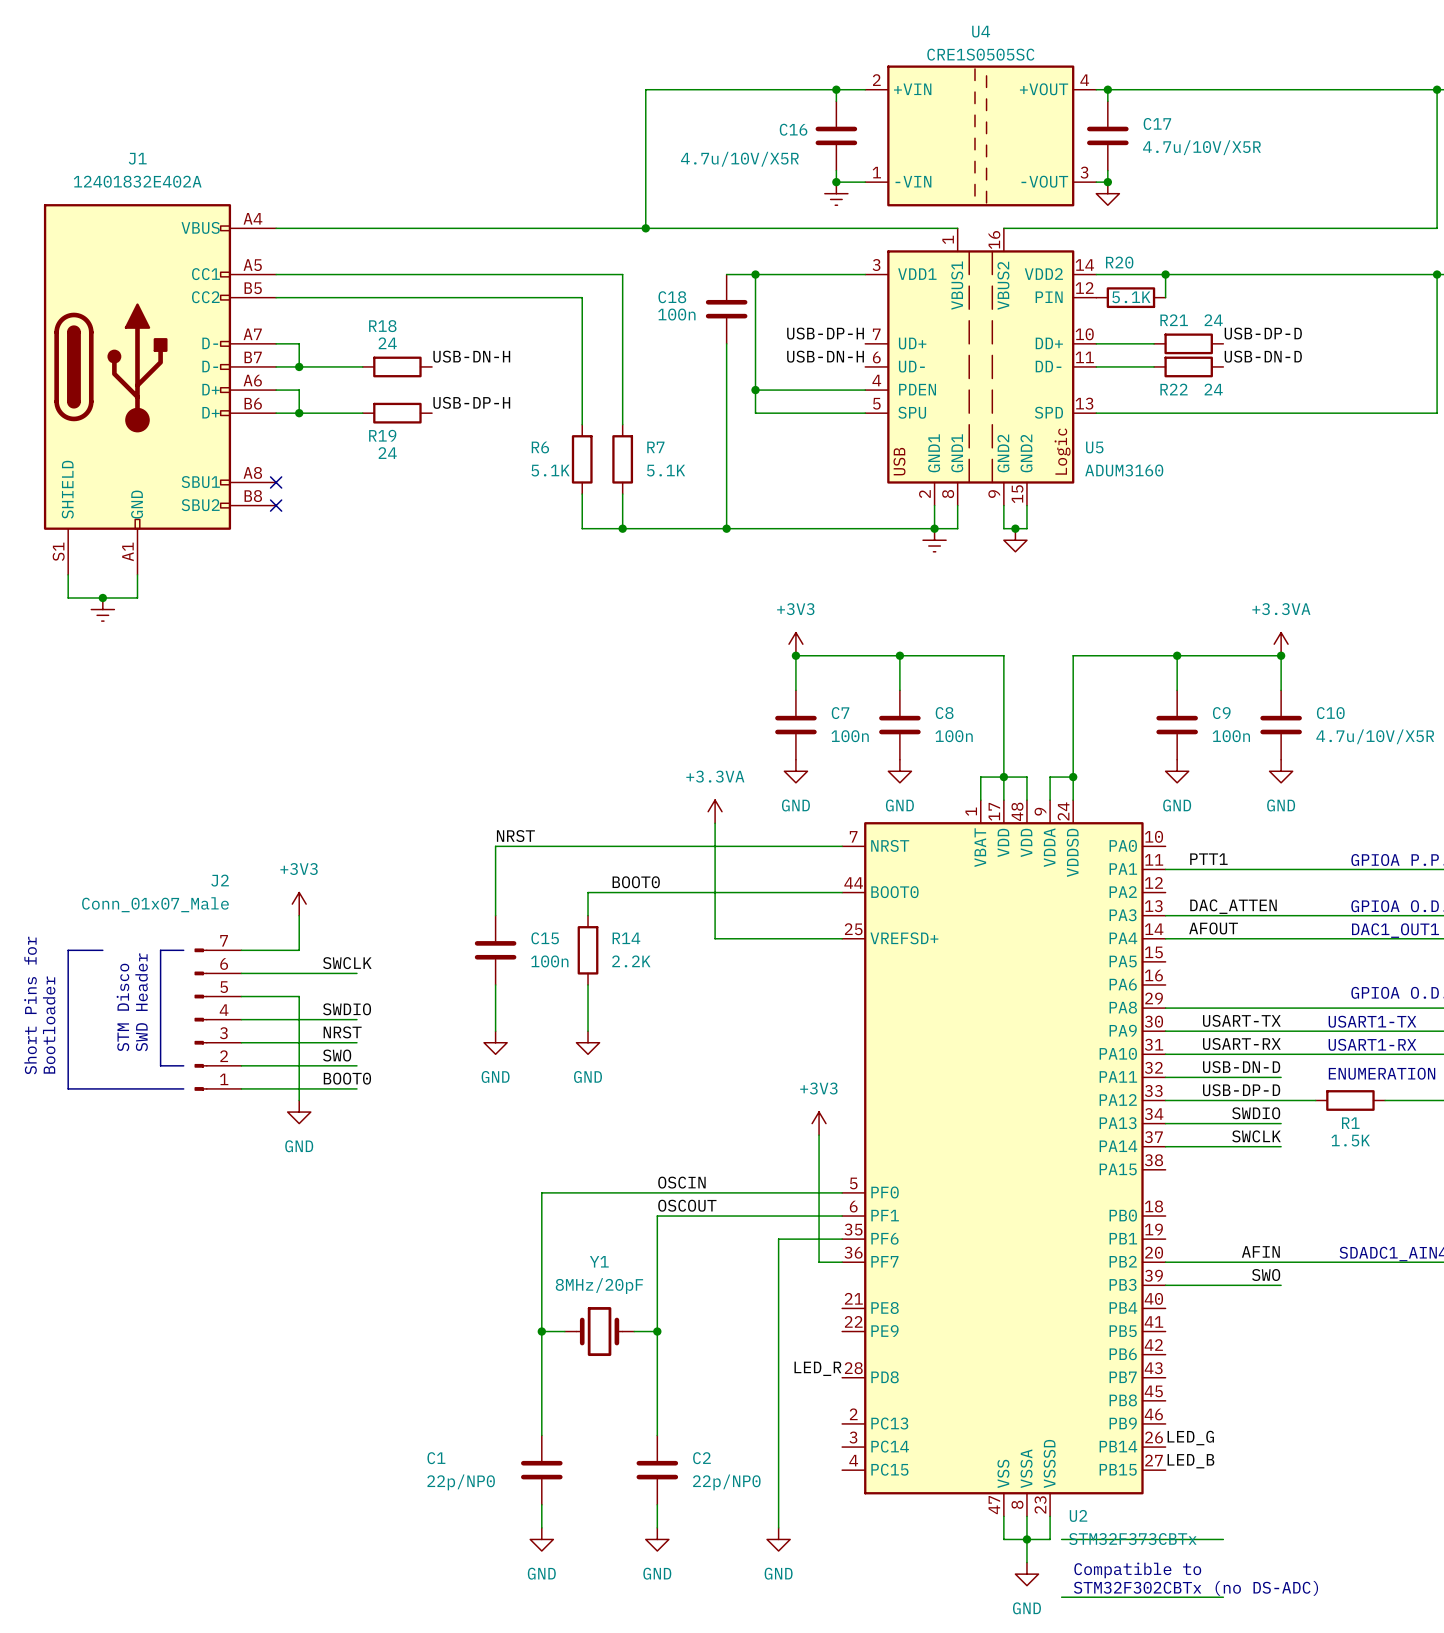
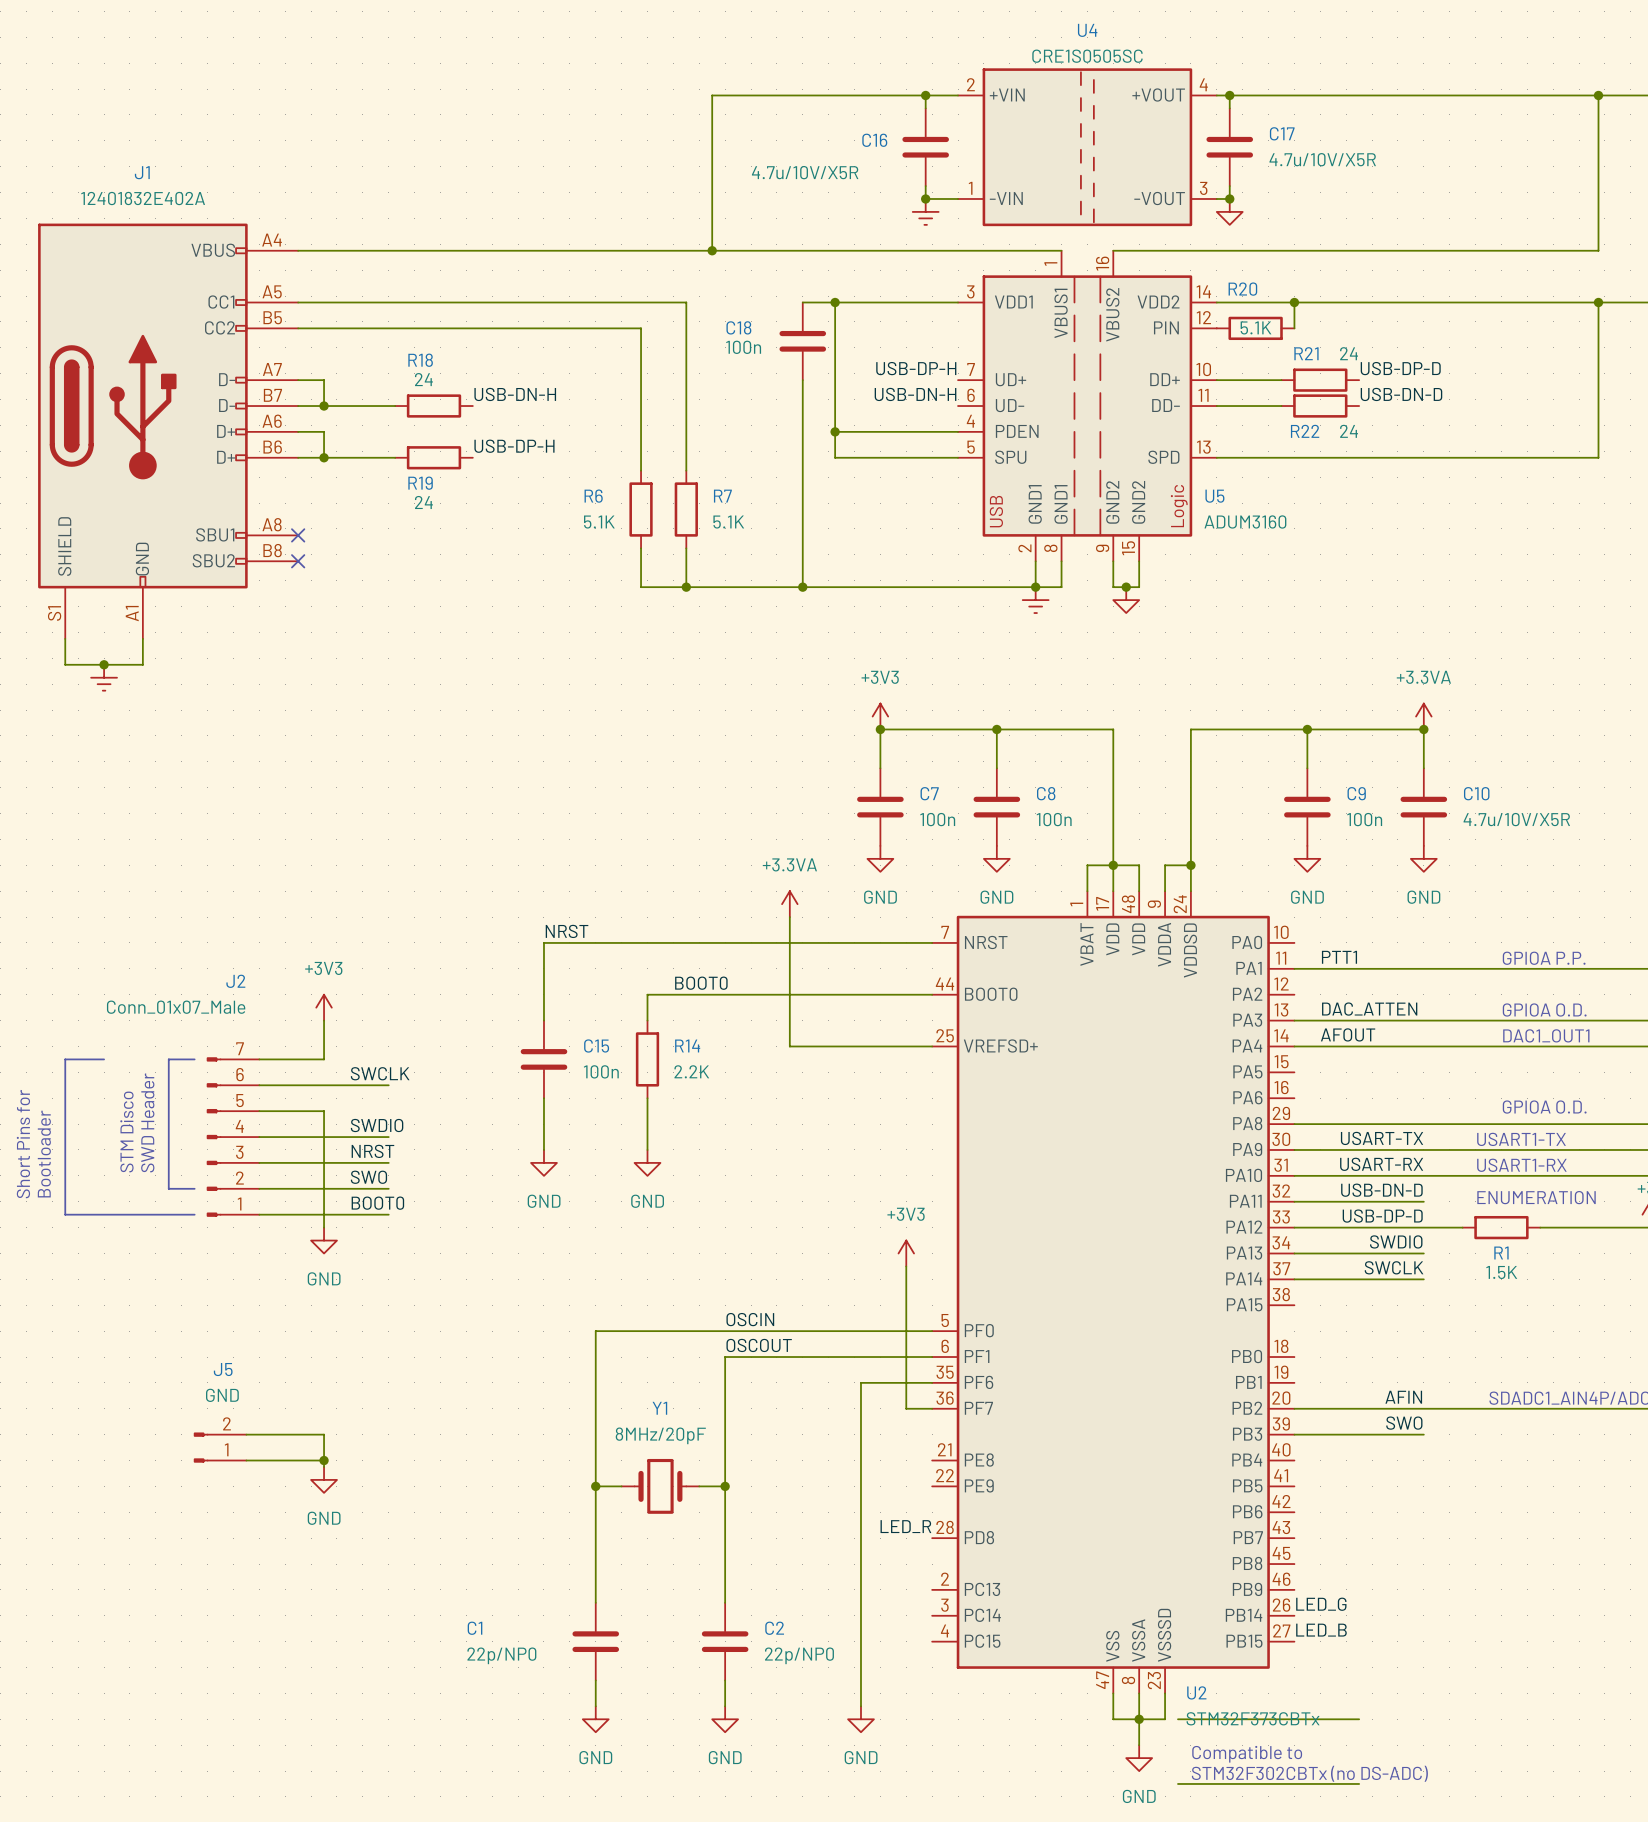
wire: none -> (246, 1434) (324, 1434) (324, 1466)
J5: none -> GND (220, 1447)
wire: none -> (246, 1460) (324, 1460)
junction: none -> (324, 1460)
power symbol: none -> GND (324, 1479)

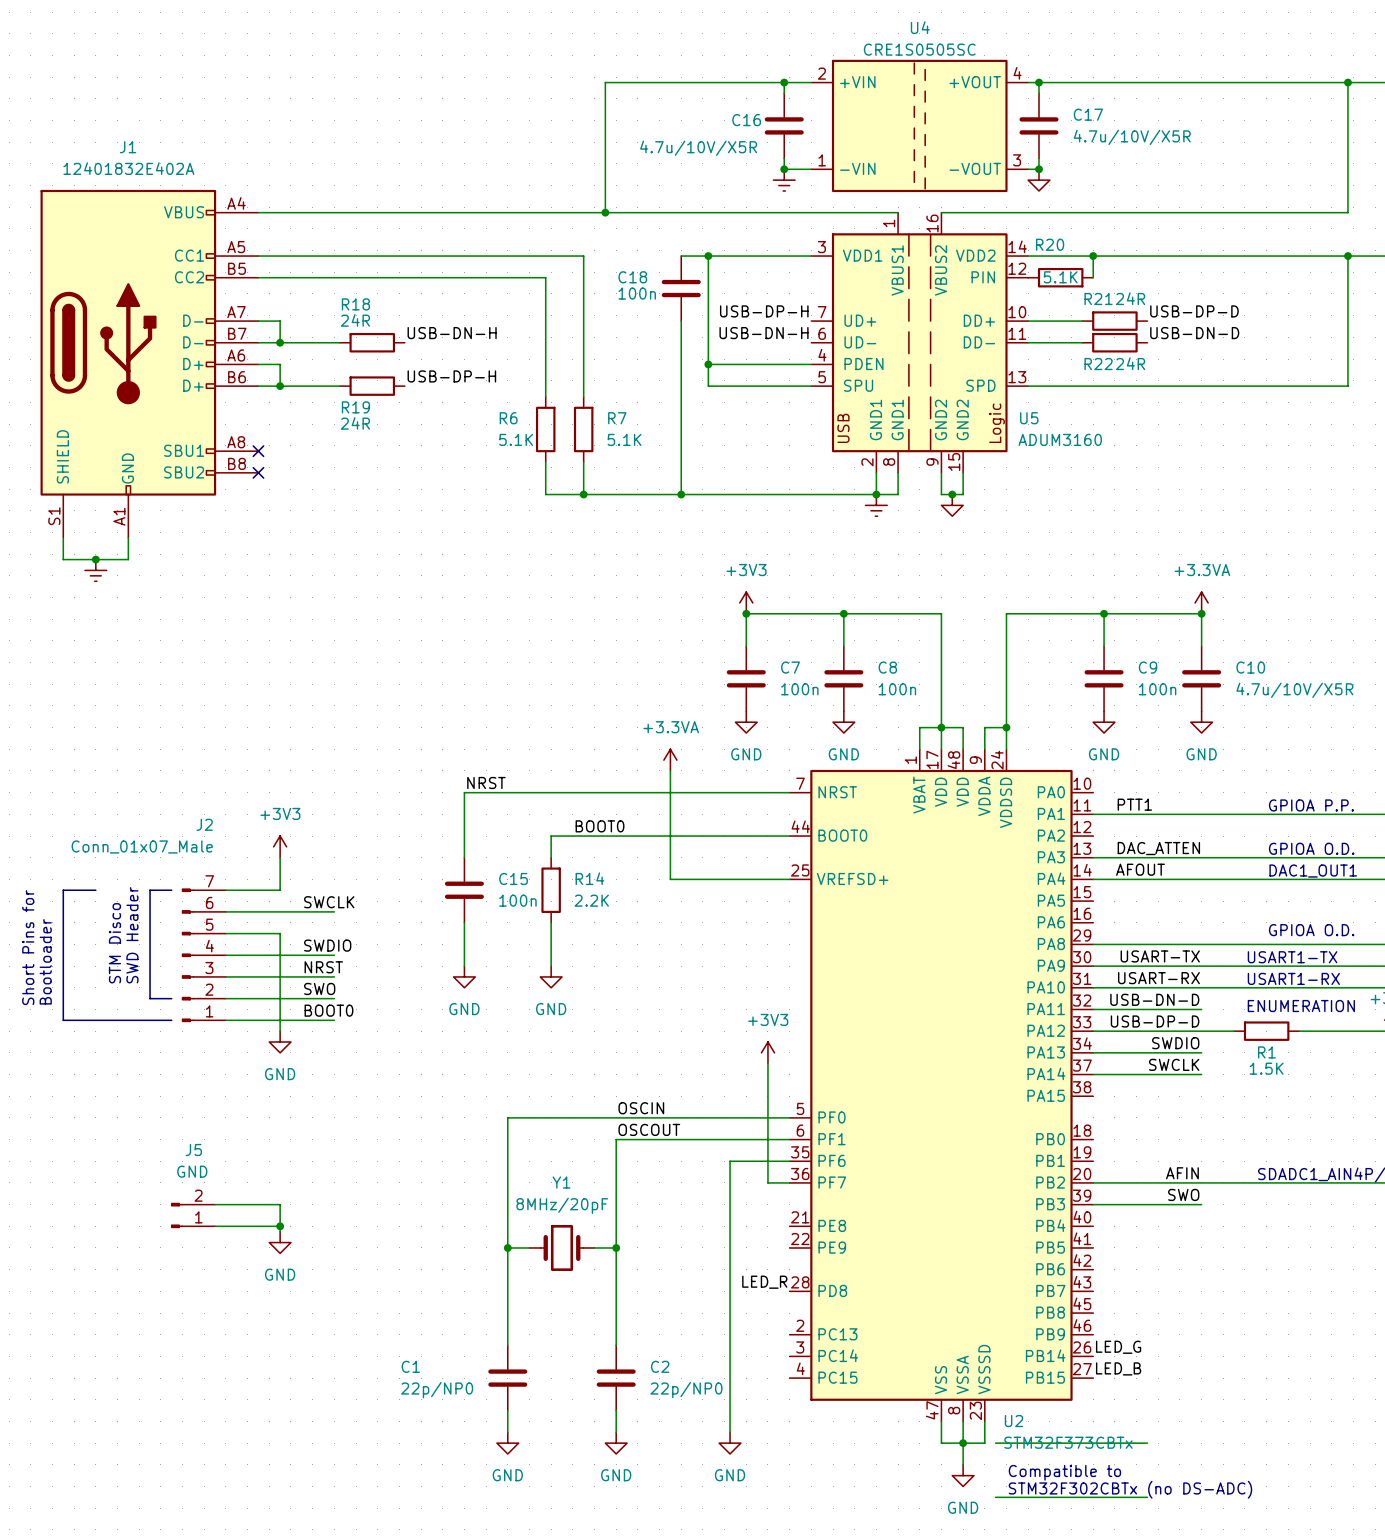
R21 value: 24 (1349, 353) -> 24R (1130, 298)
R18 value: 24 (423, 379) -> 24R (355, 320)
R22 value: 24 (1349, 431) -> 24R (1130, 363)
R19 value: 24 (423, 502) -> 24R (355, 423)

